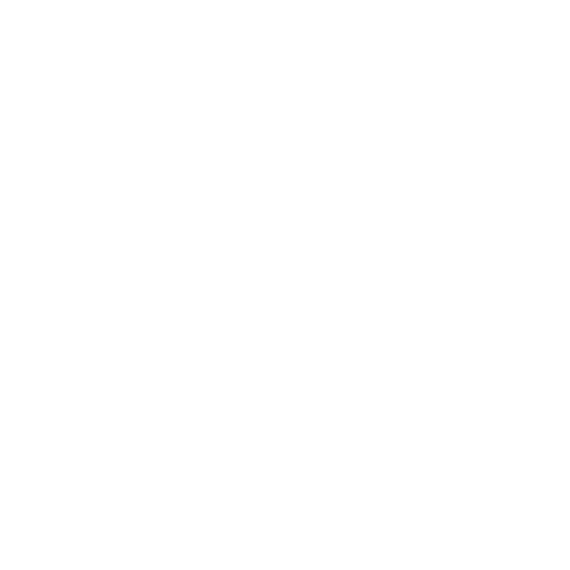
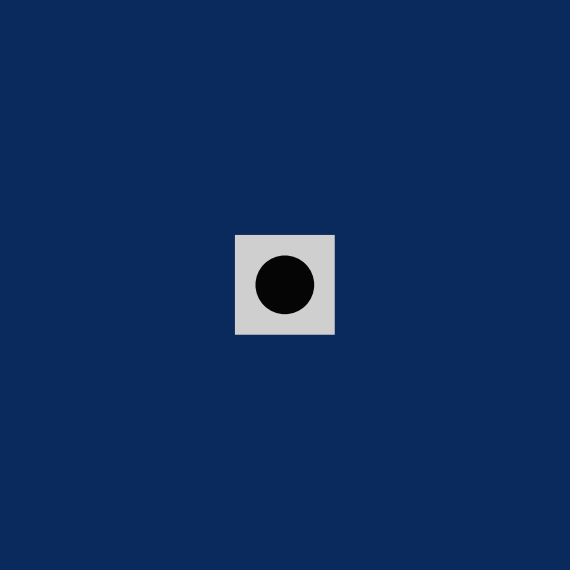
part: none -> (284, 284)

